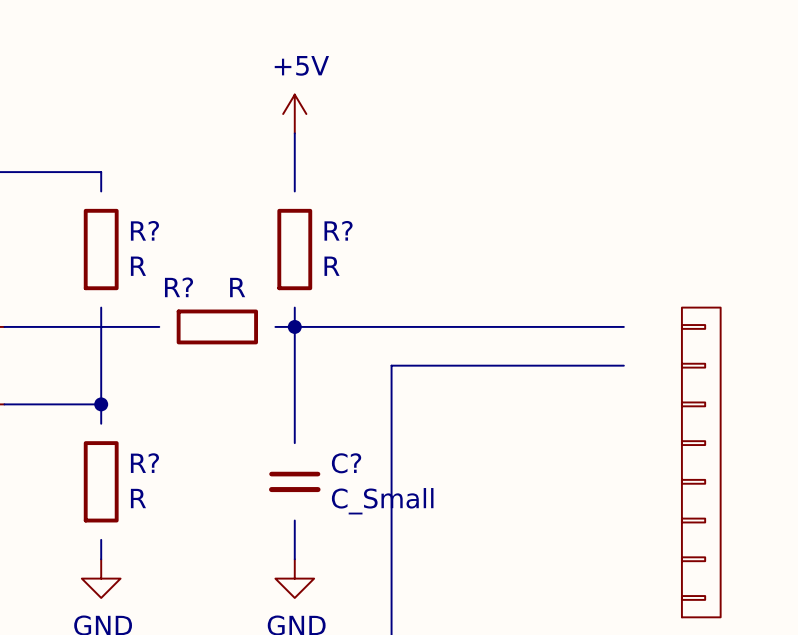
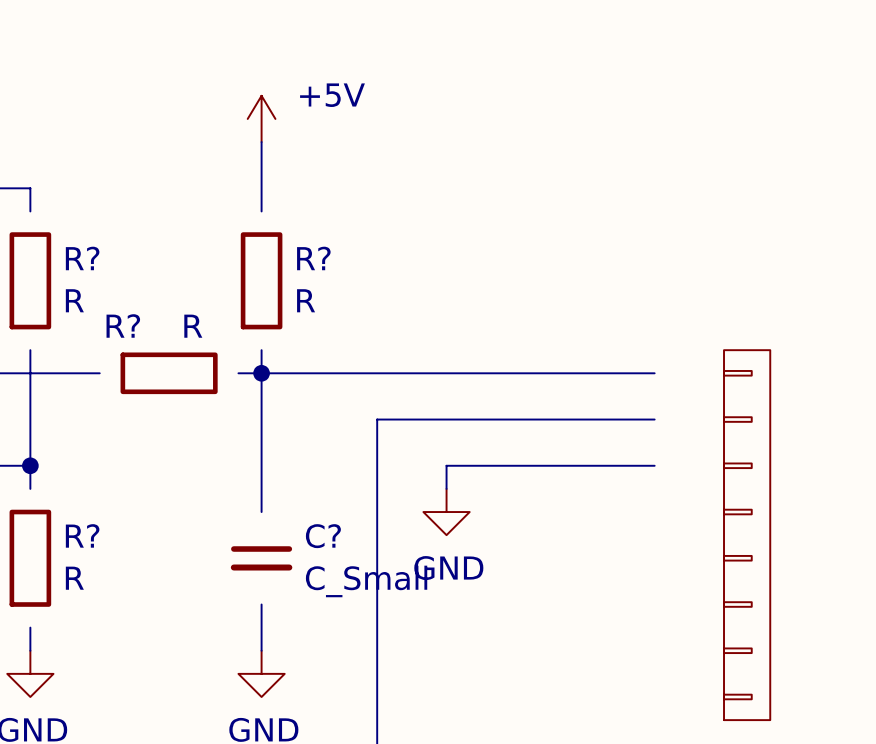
power symbol text position: +5V (301, 65) -> +5V (332, 95)
wire: none -> (654, 465) (446, 465) (446, 488)
power symbol: none -> GND (446, 512)

